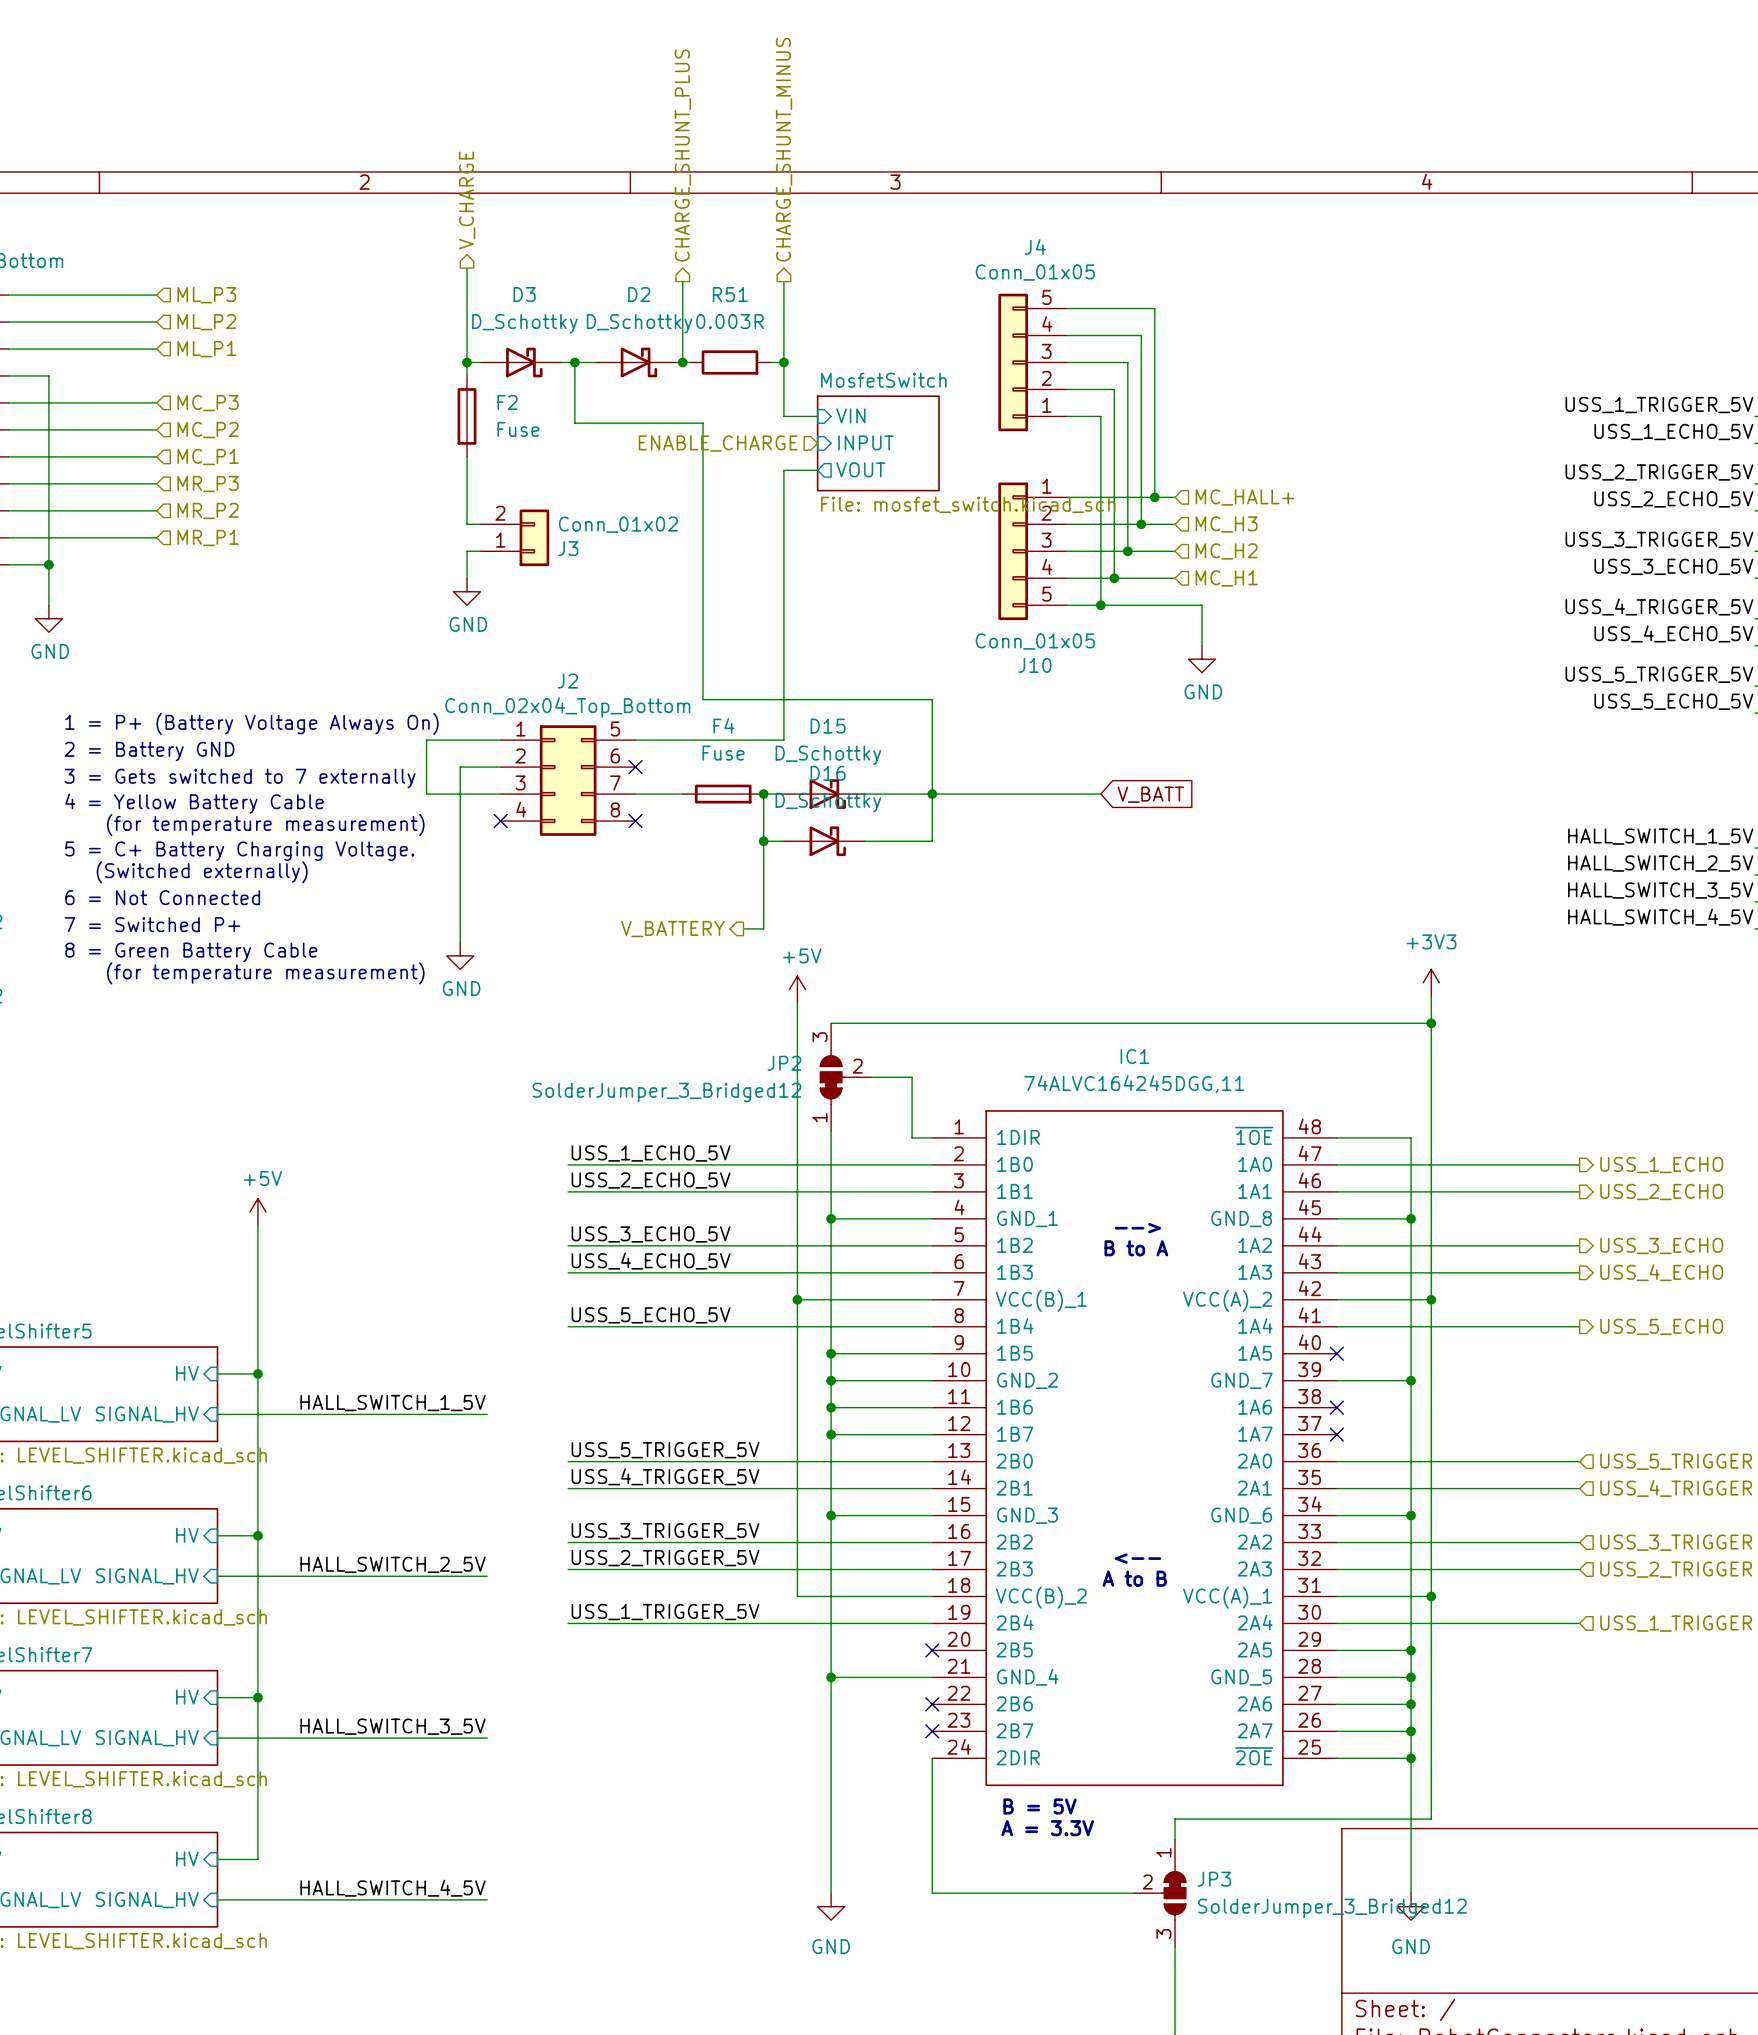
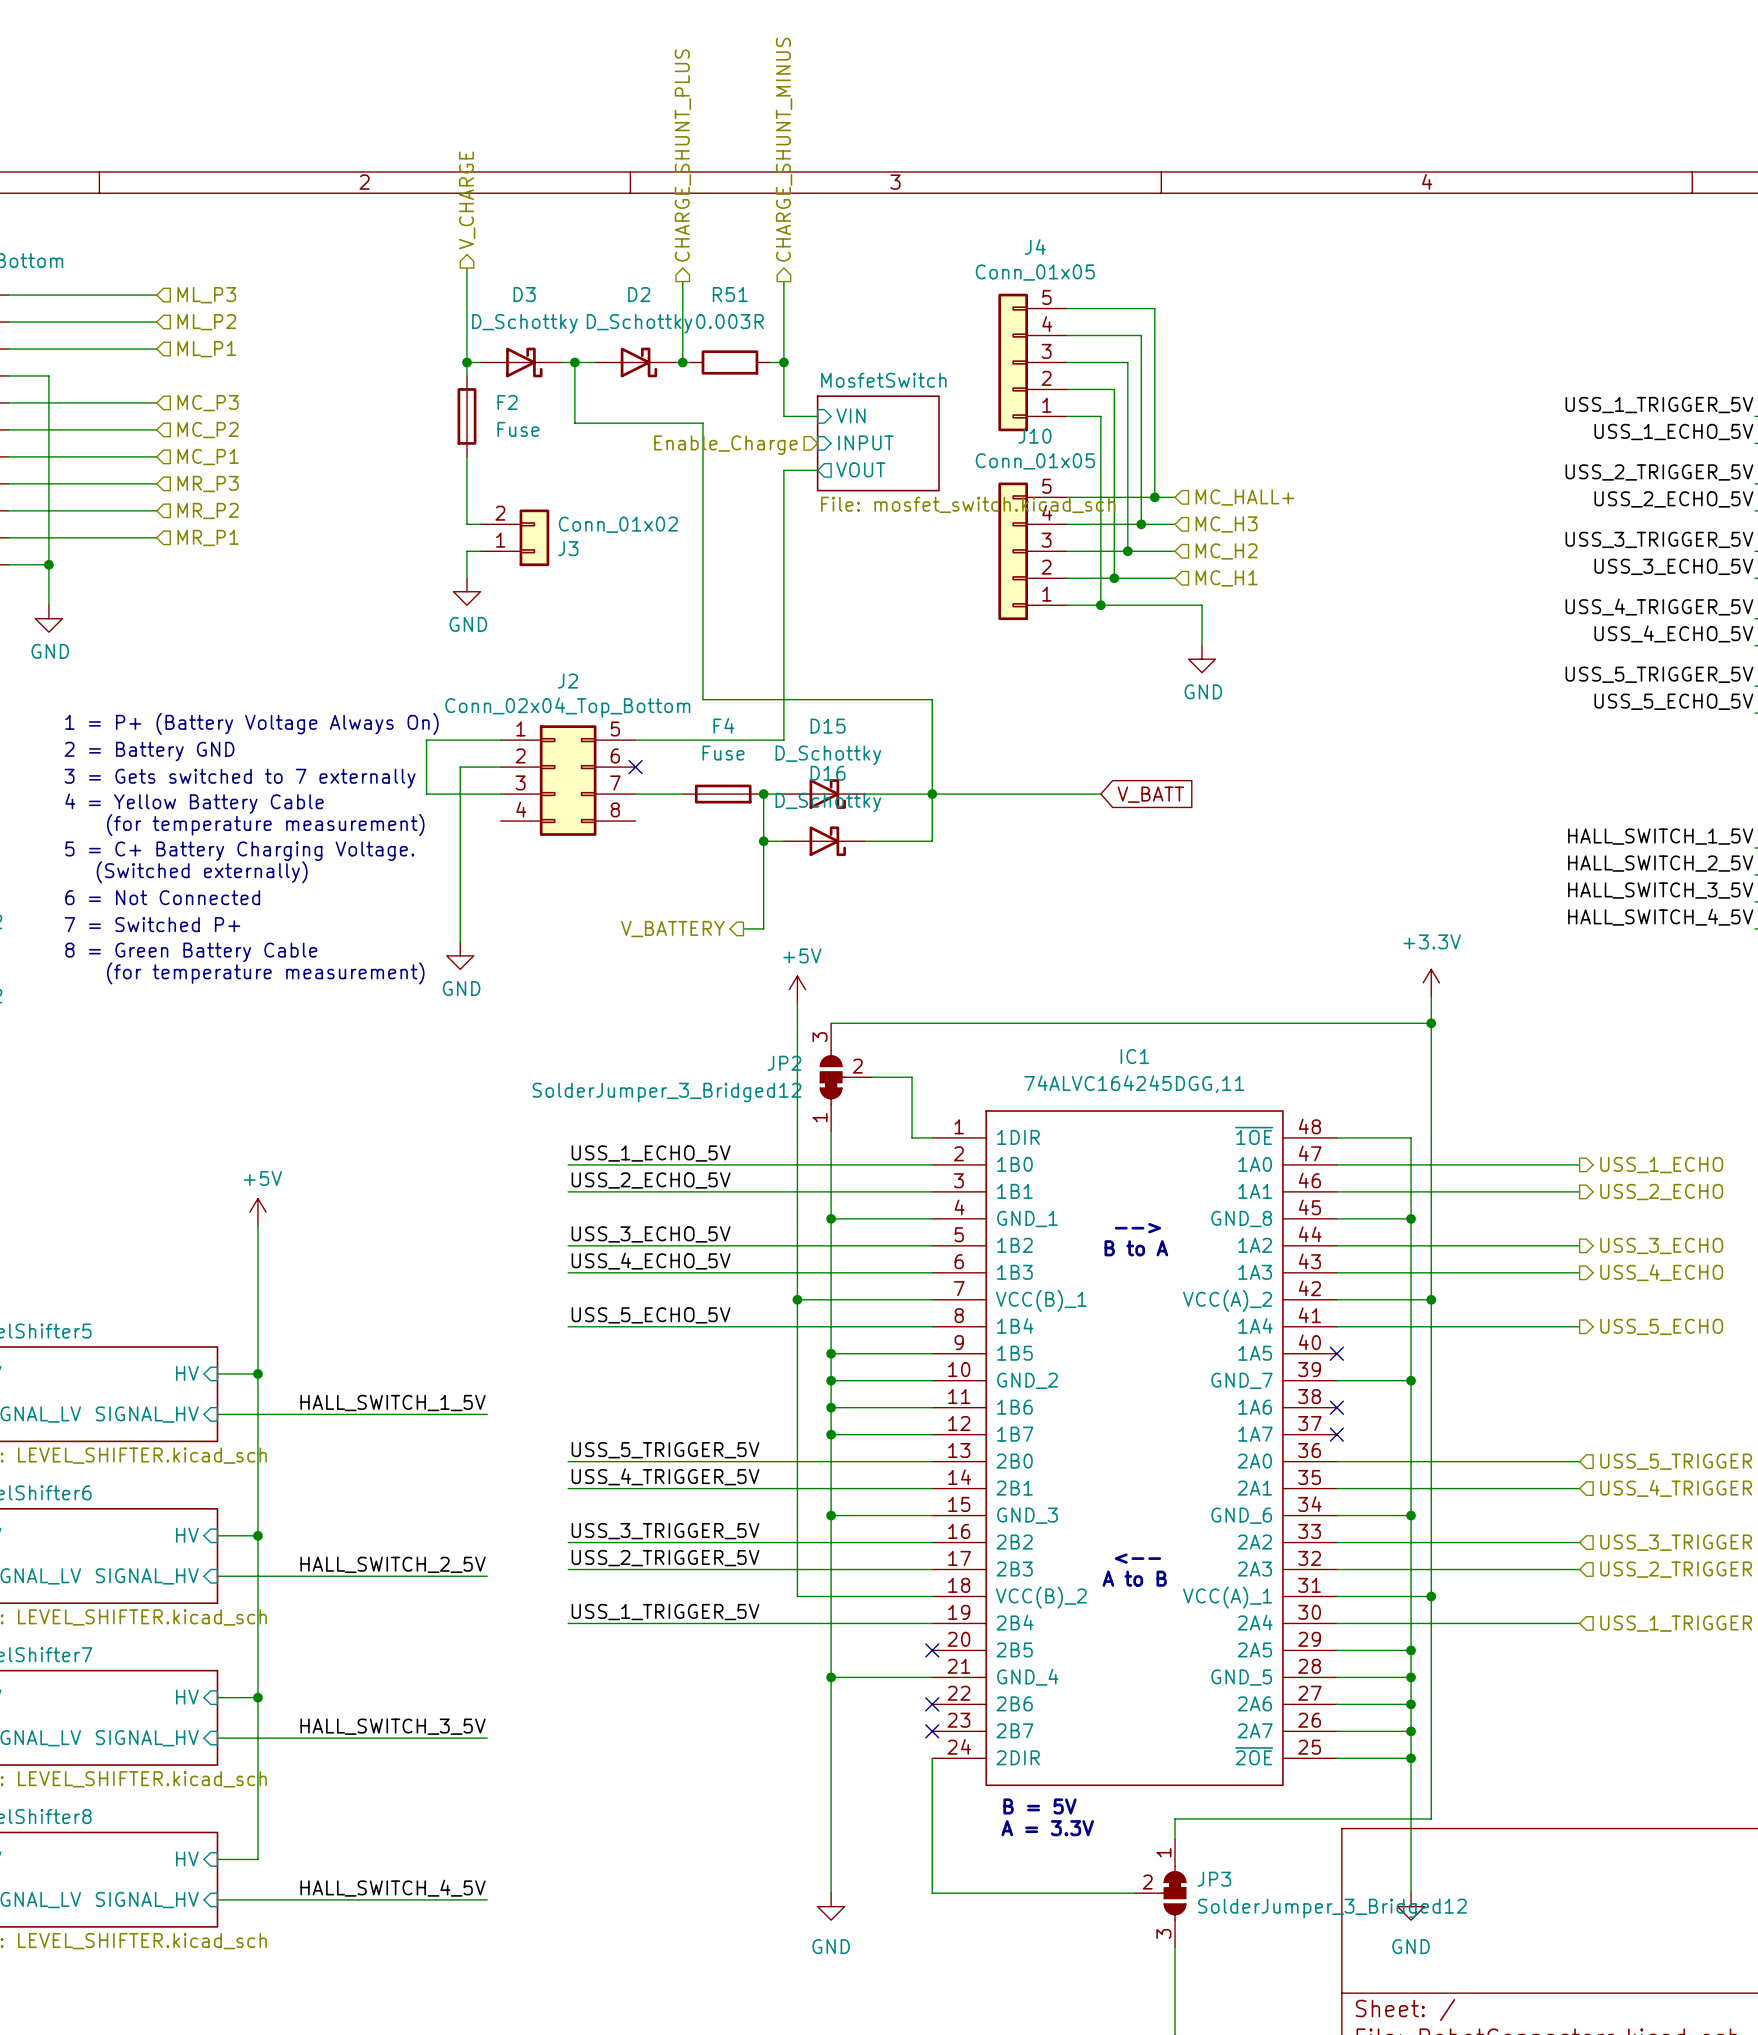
hierarchical label: ENABLE_CHARGE (718, 443) -> Enable_Charge (725, 445)
J10 flip: as is (1013, 551) -> up-down (1013, 551)
no-connect mark: (500, 821) -> none
no-connect mark: (635, 821) -> none
power symbol: +3V3 (1431, 982) -> +3.3V (1431, 982)

